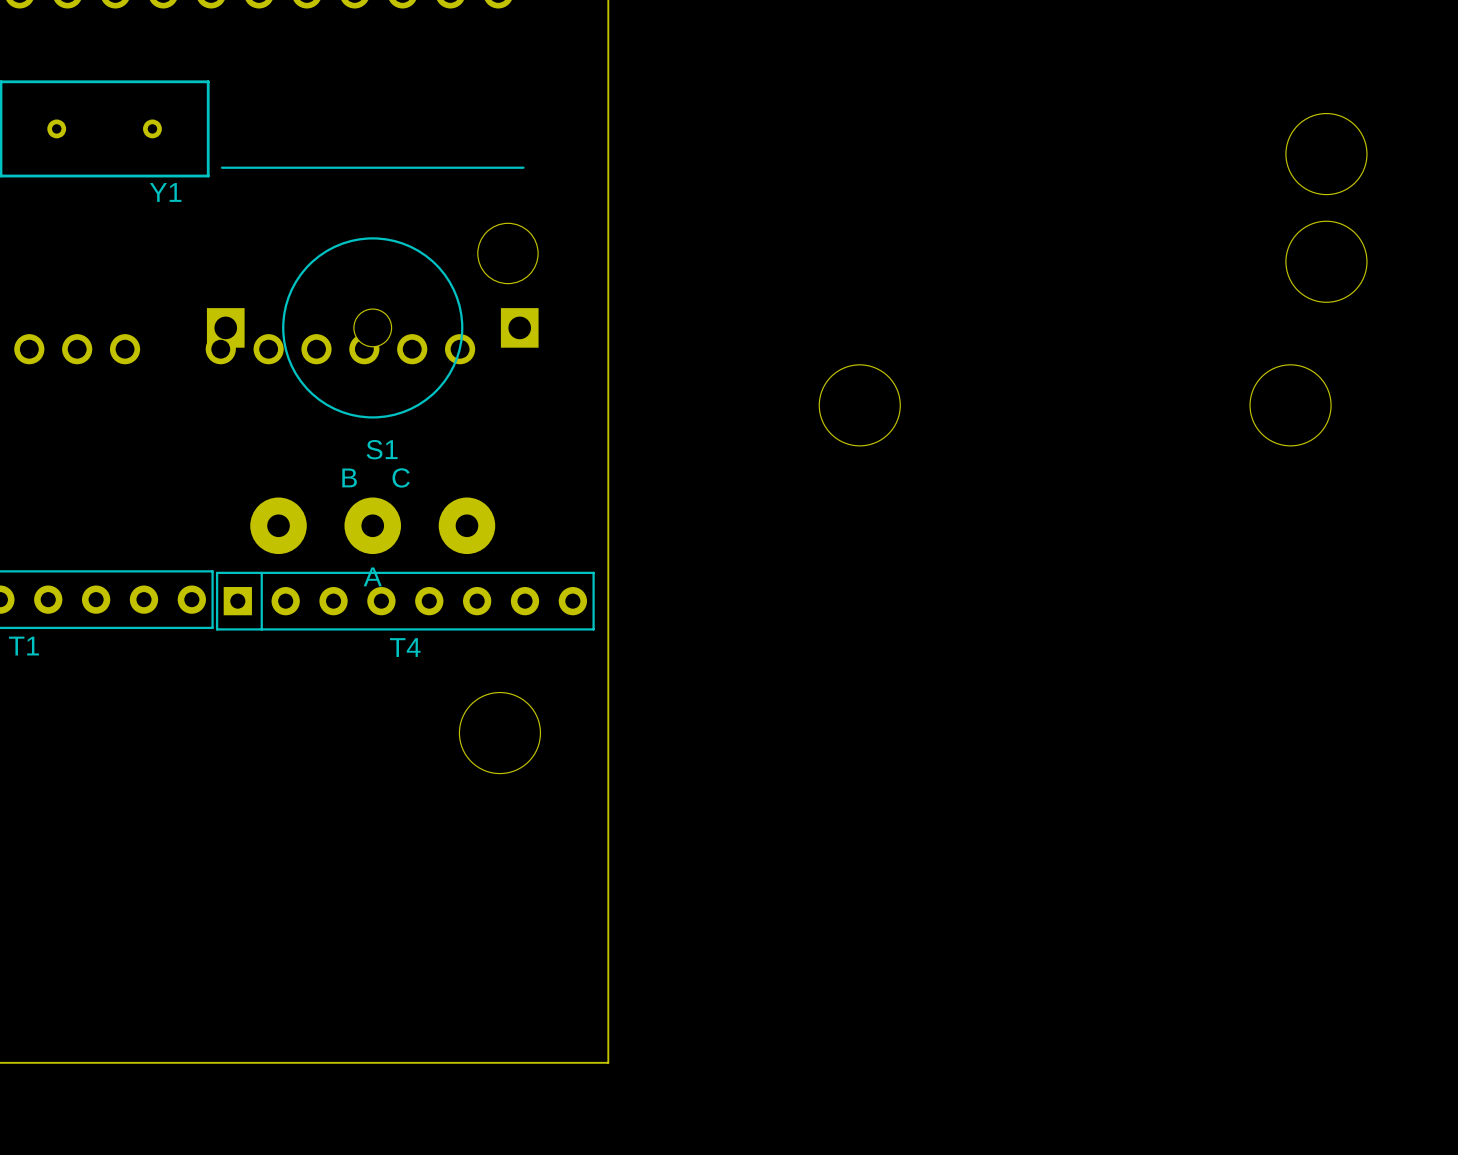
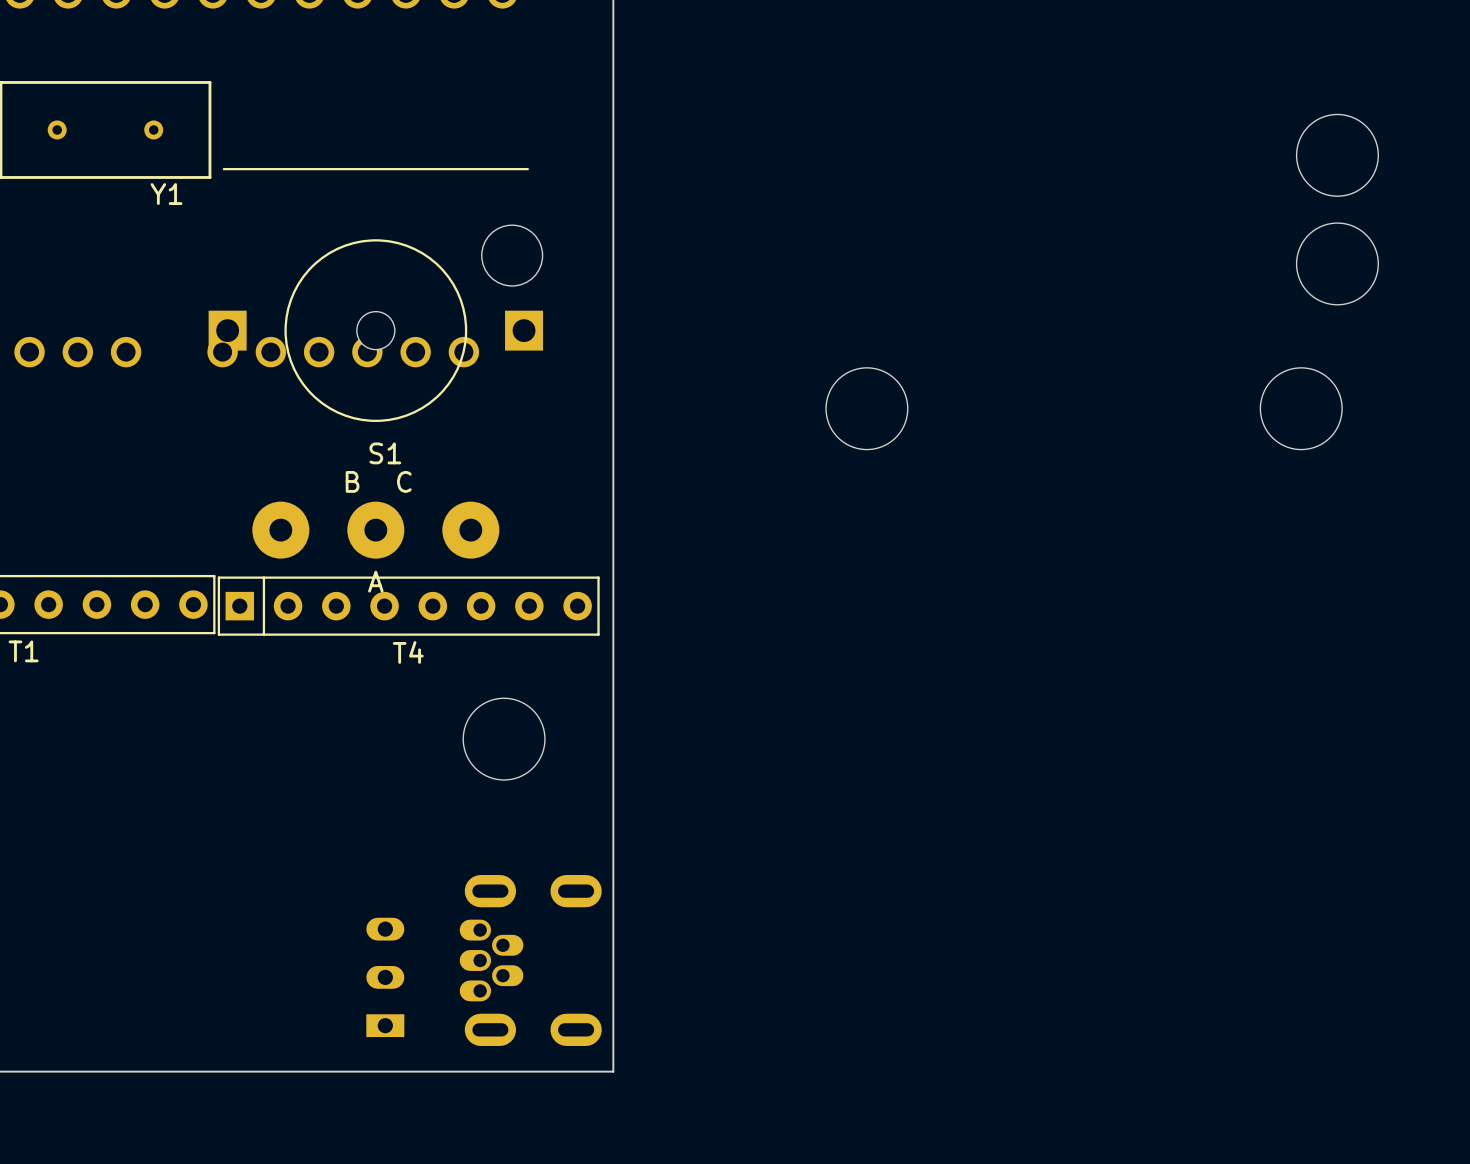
part: none -> (530, 960)
part: none -> (385, 977)

